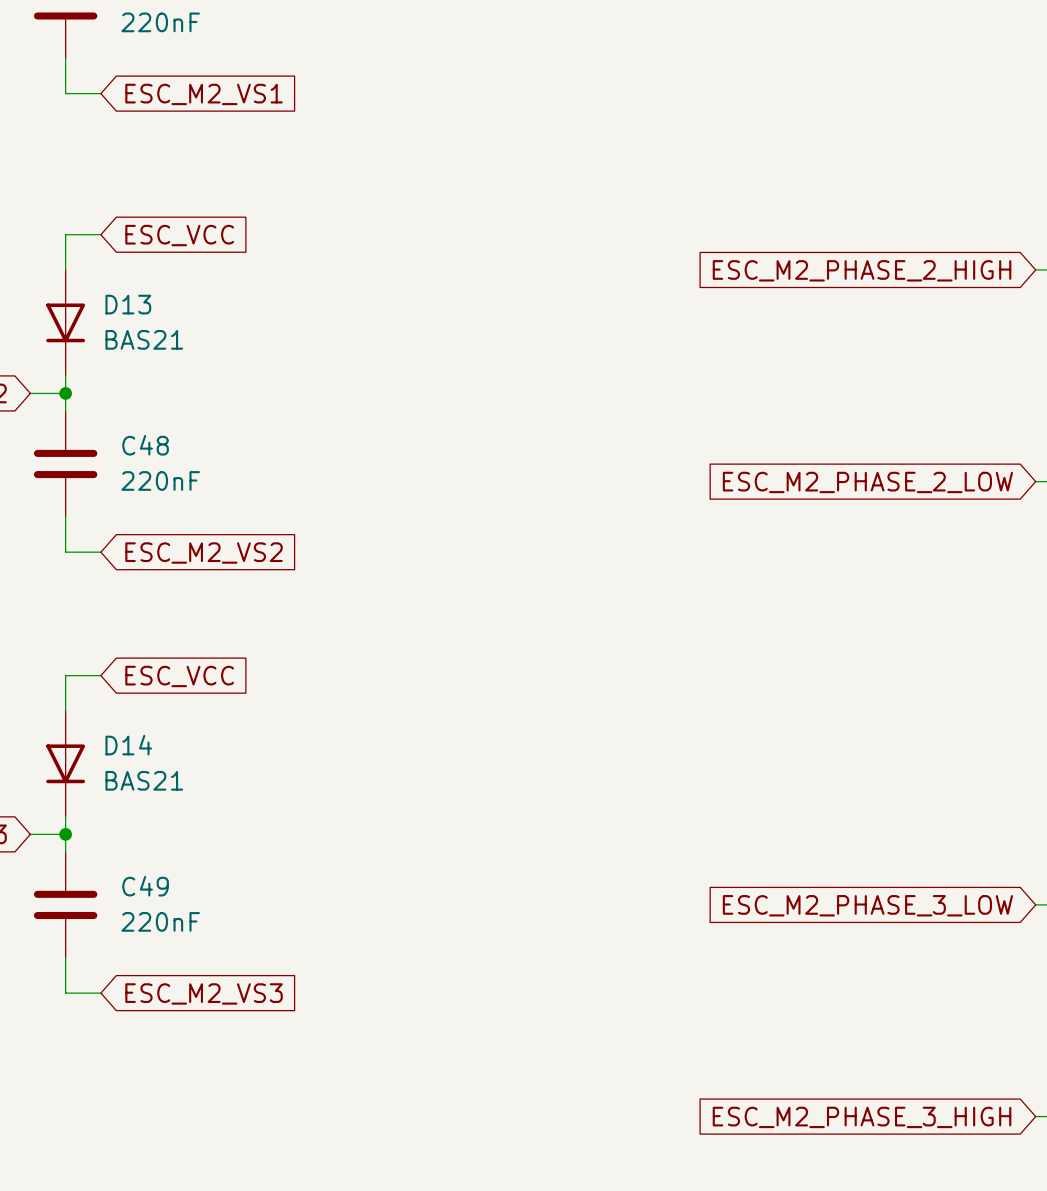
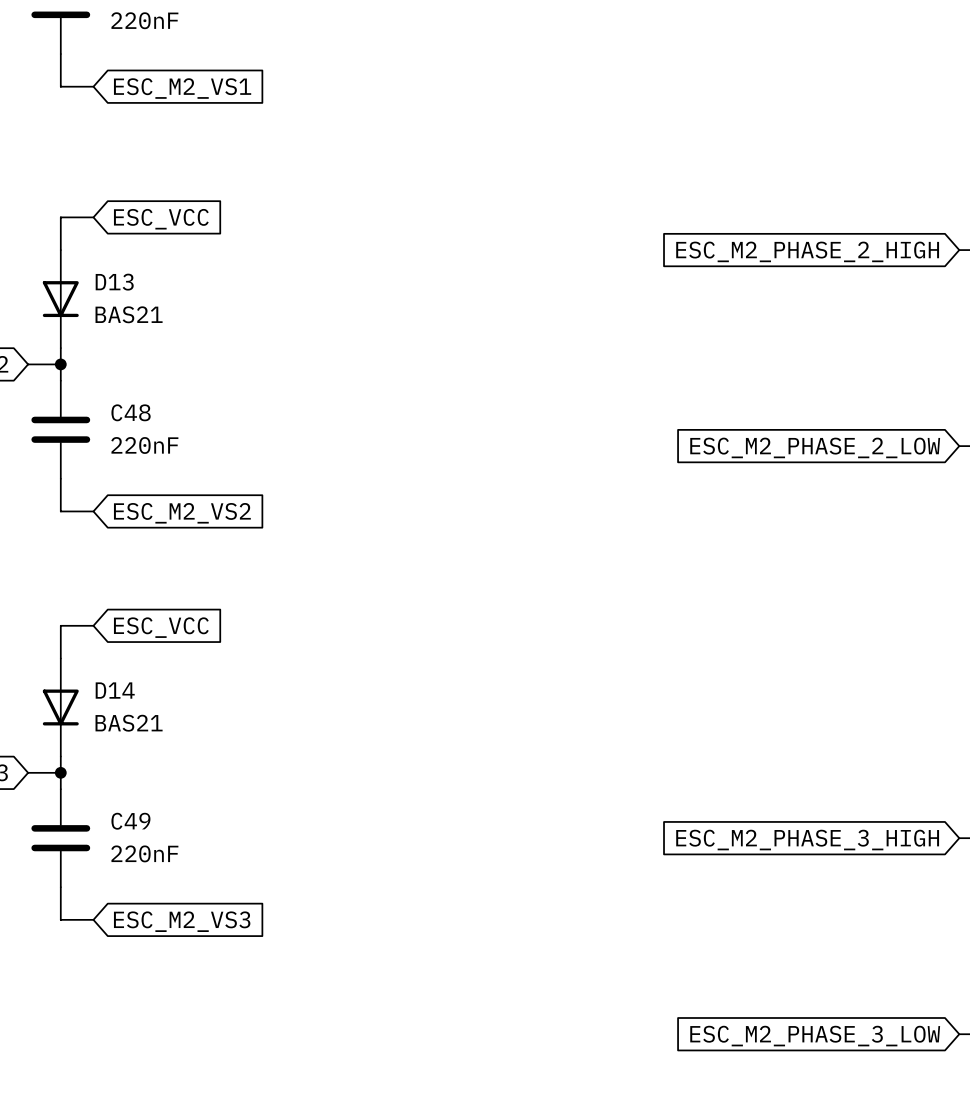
global label: ESC_M2_PHASE_3_LOW (867, 905) -> ESC_M2_PHASE_3_HIGH (807, 840)
global label: ESC_M2_PHASE_3_HIGH (862, 1117) -> ESC_M2_PHASE_3_LOW (815, 1036)

